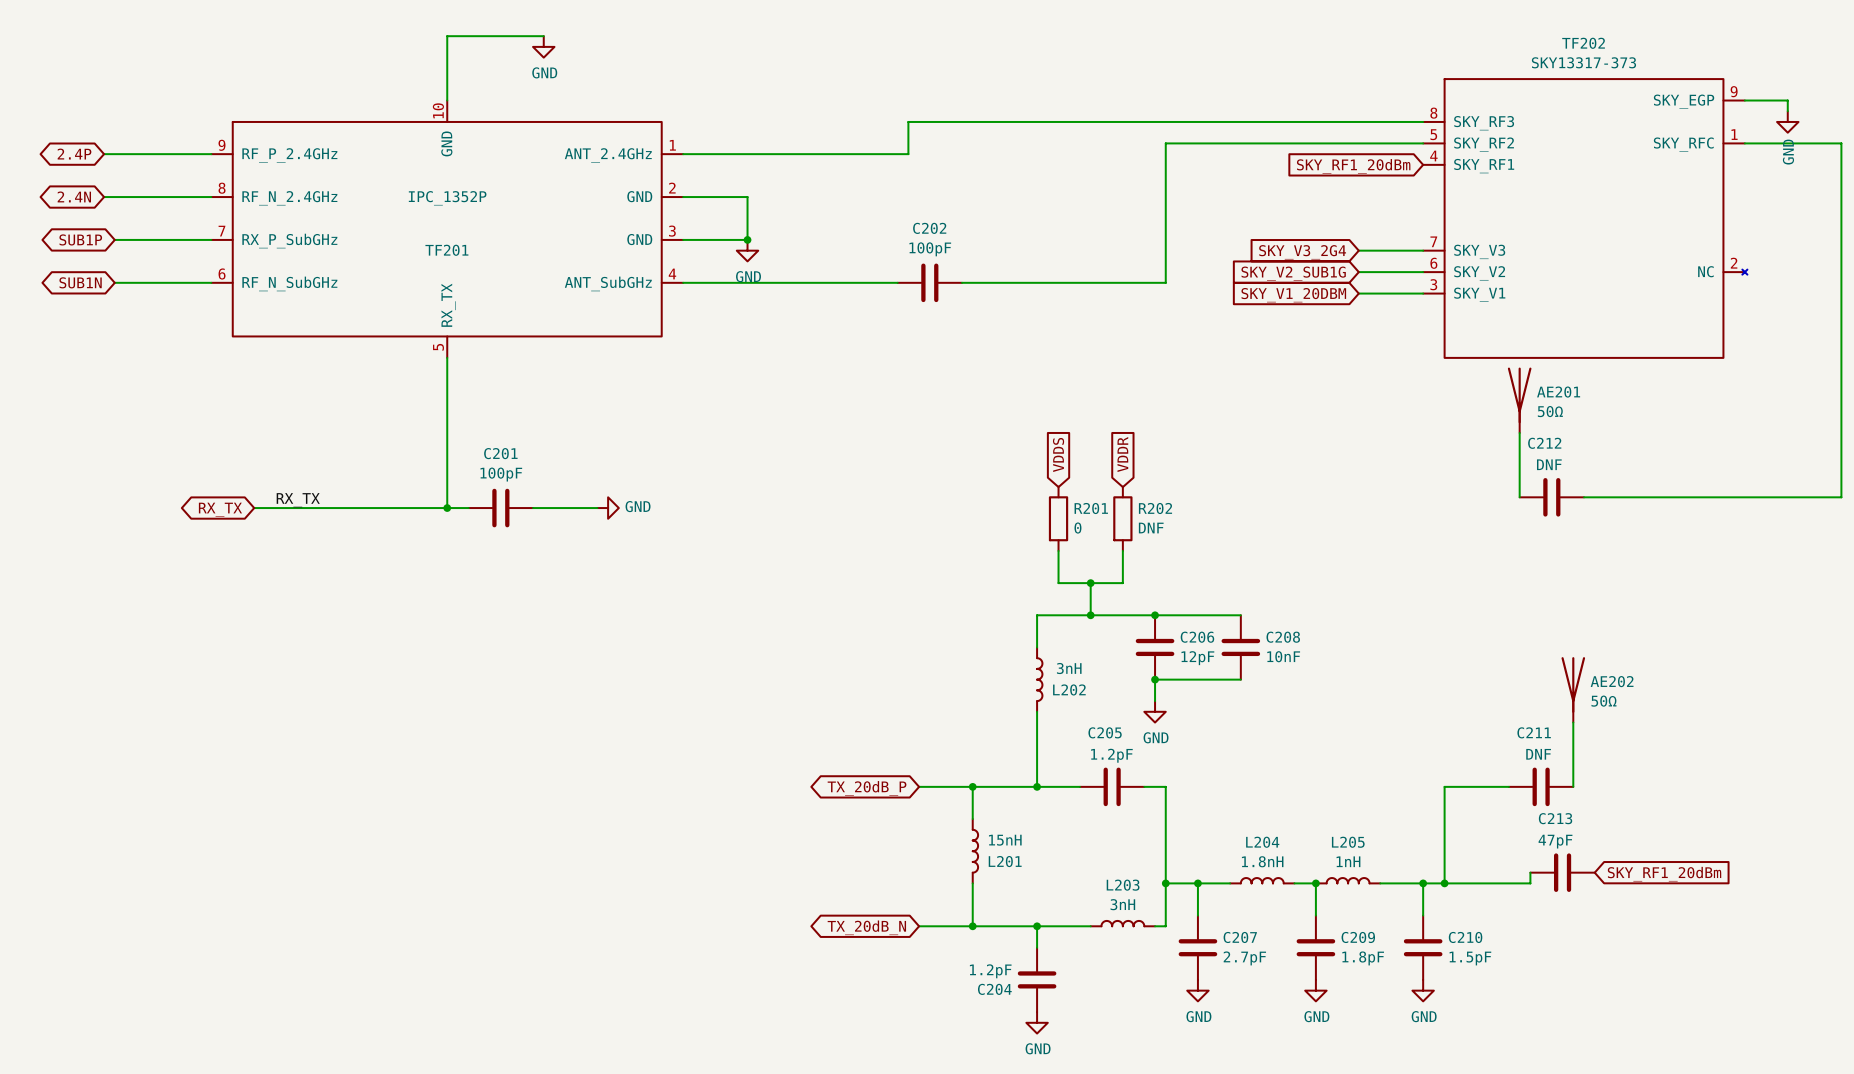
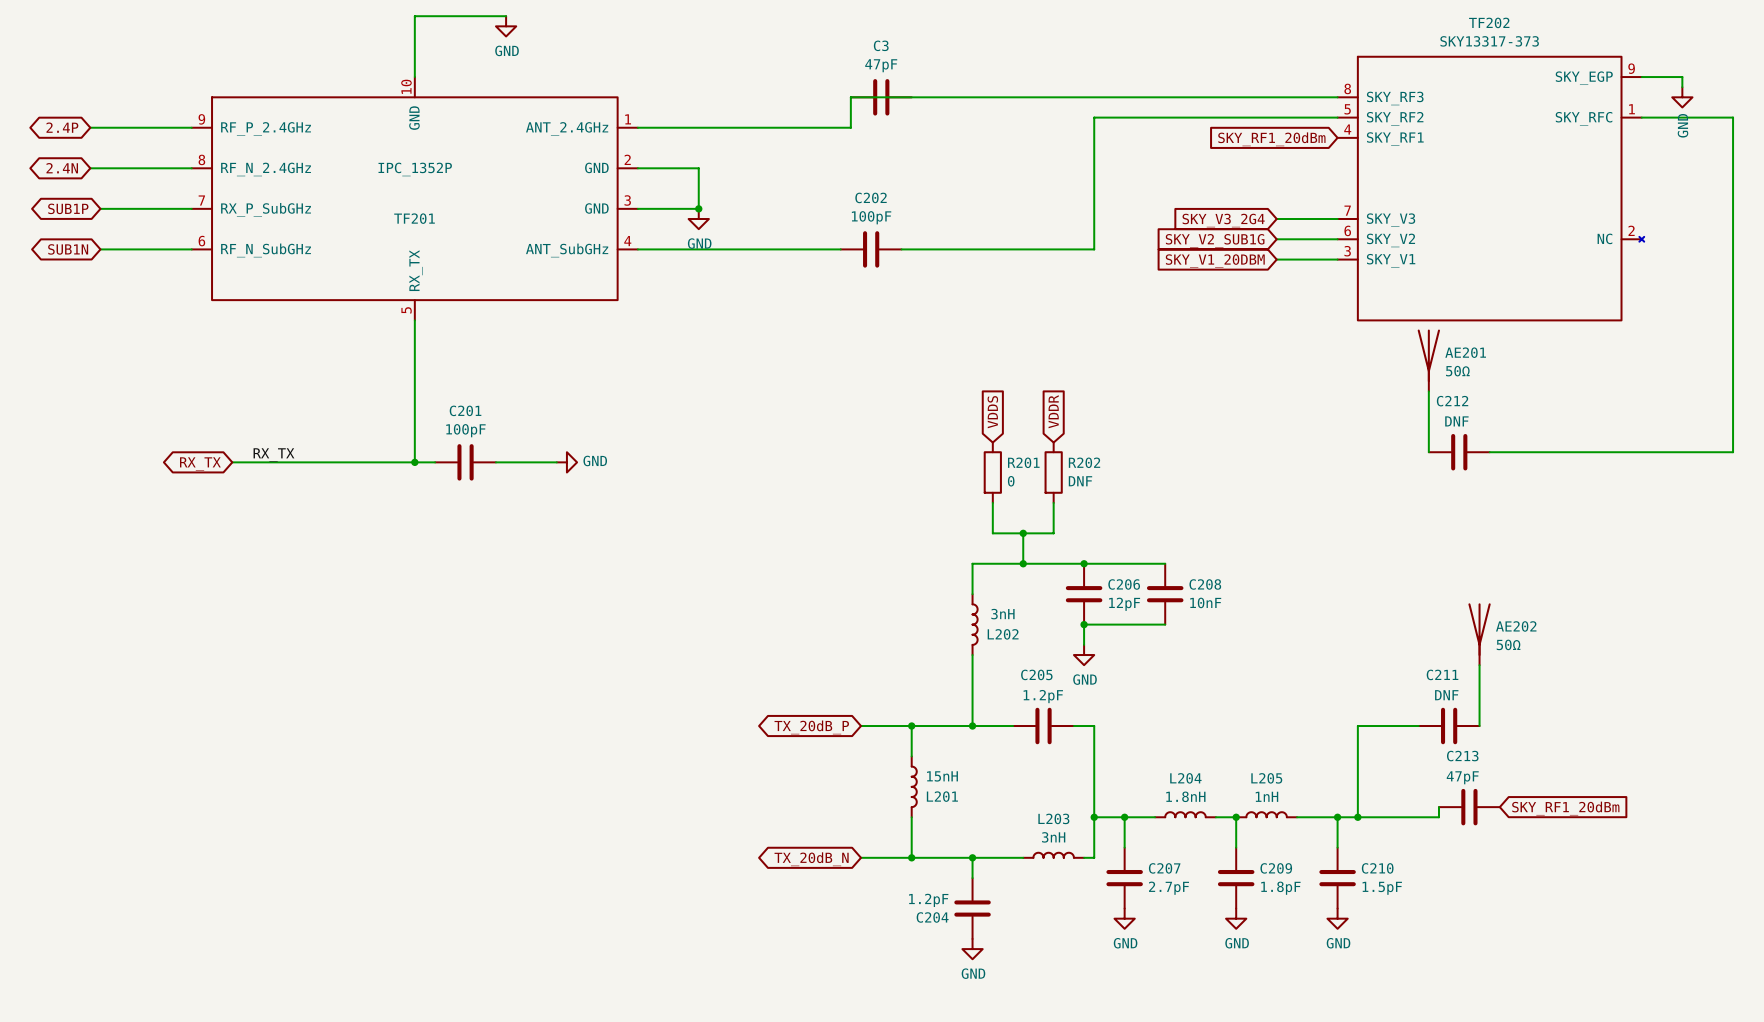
C3: none -> 47pF (881, 97)

